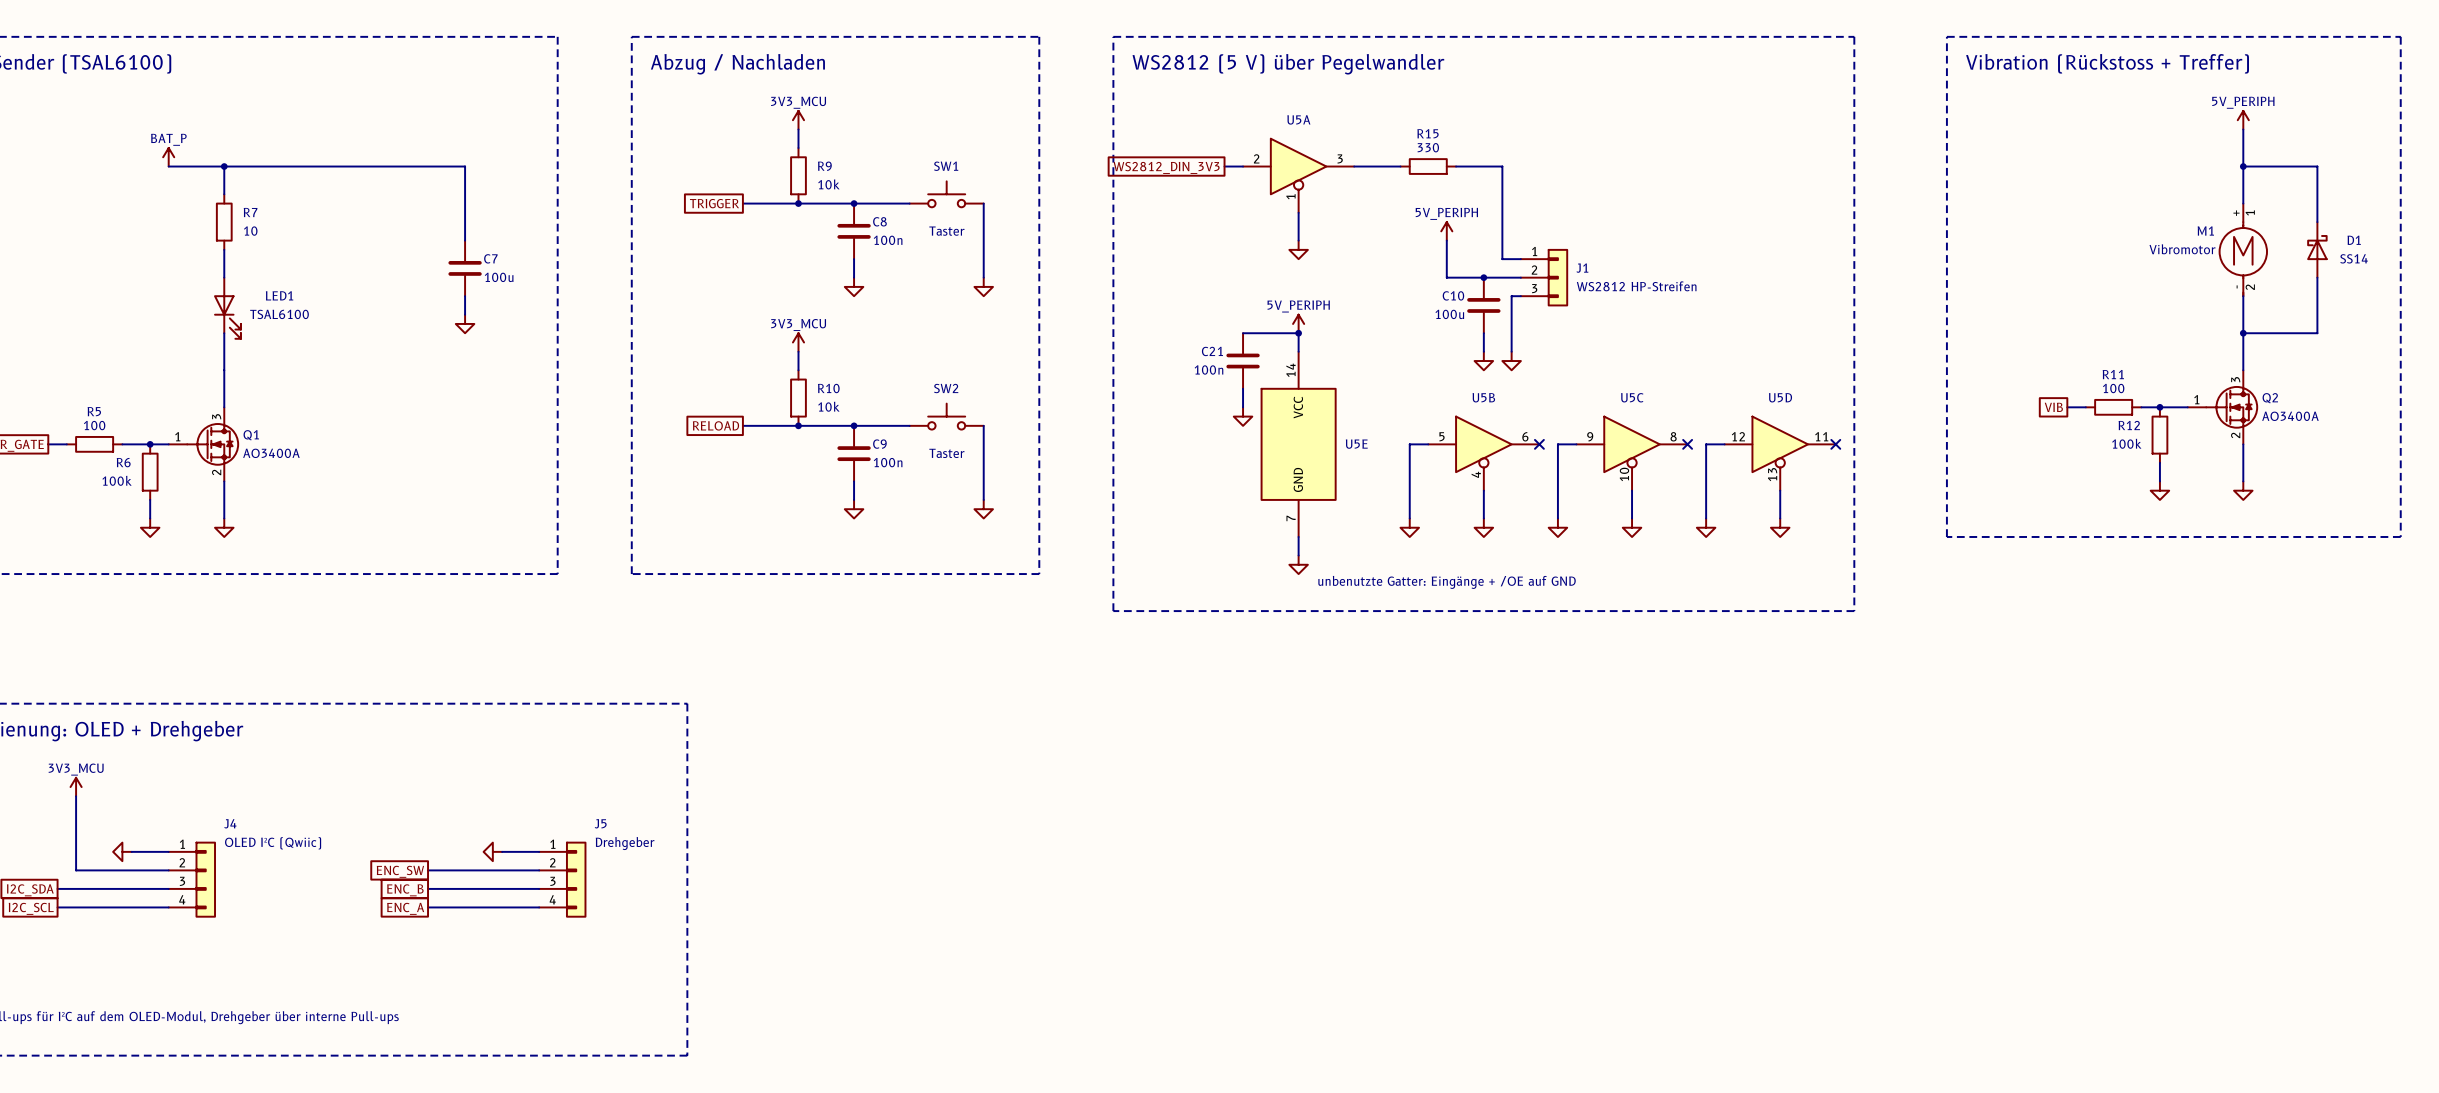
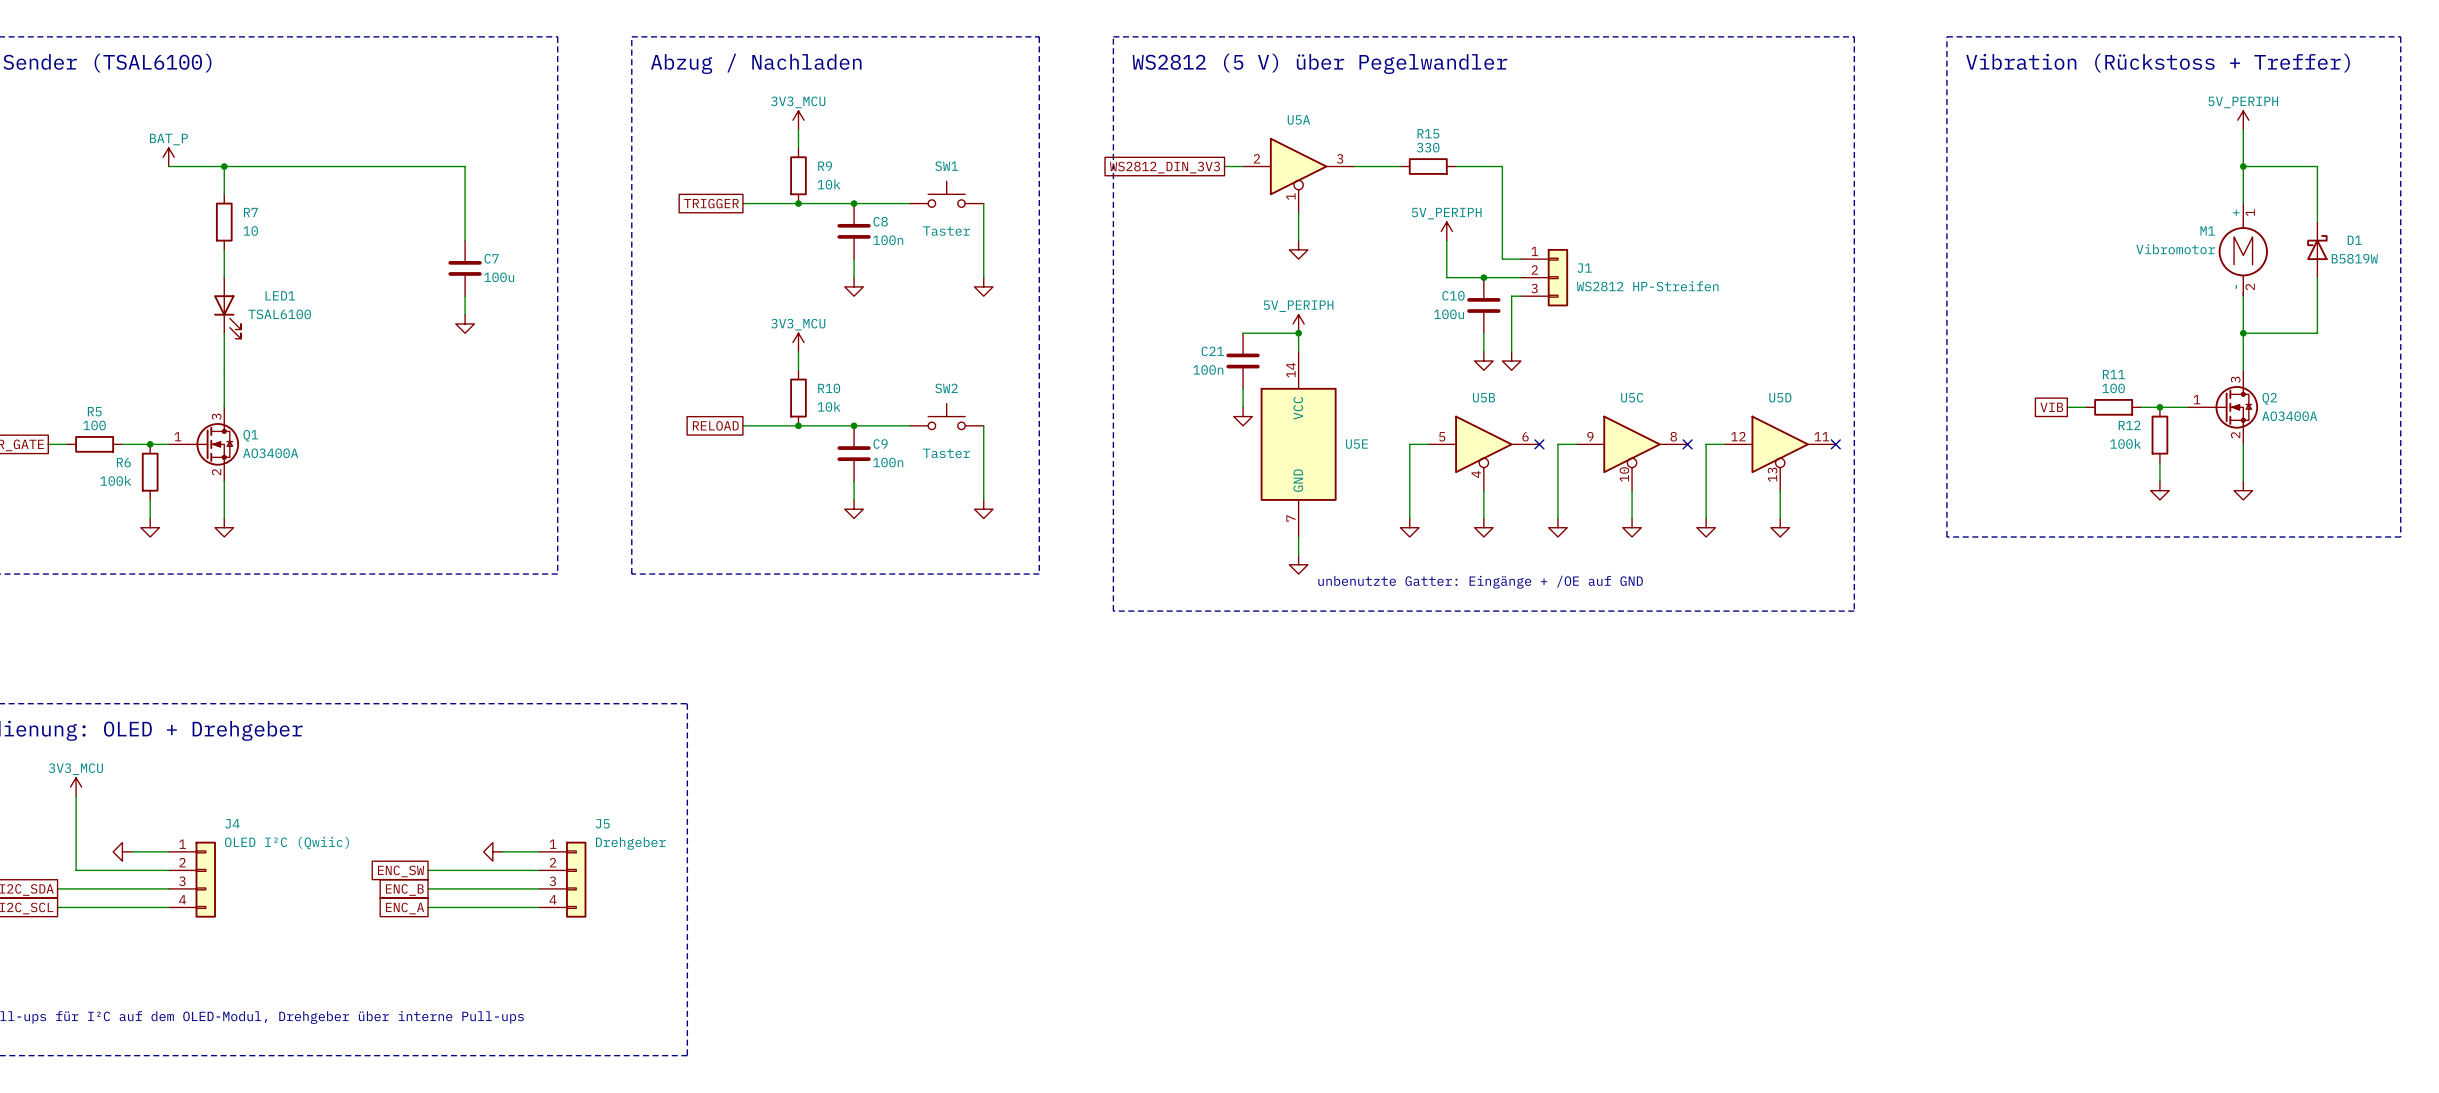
D1 value: SS14 (2354, 258) -> B5819W (2354, 258)

